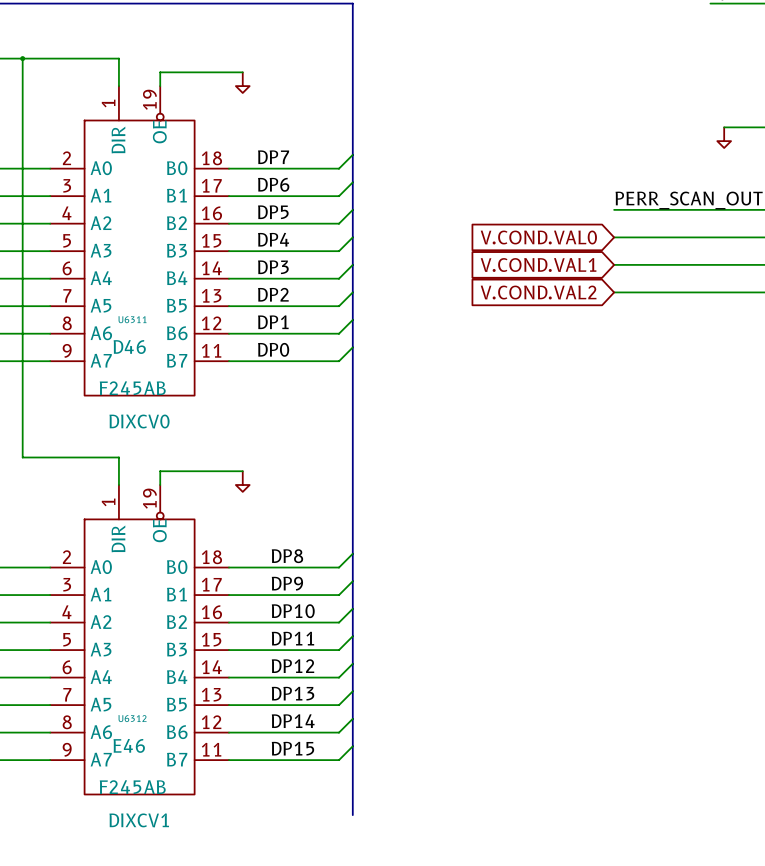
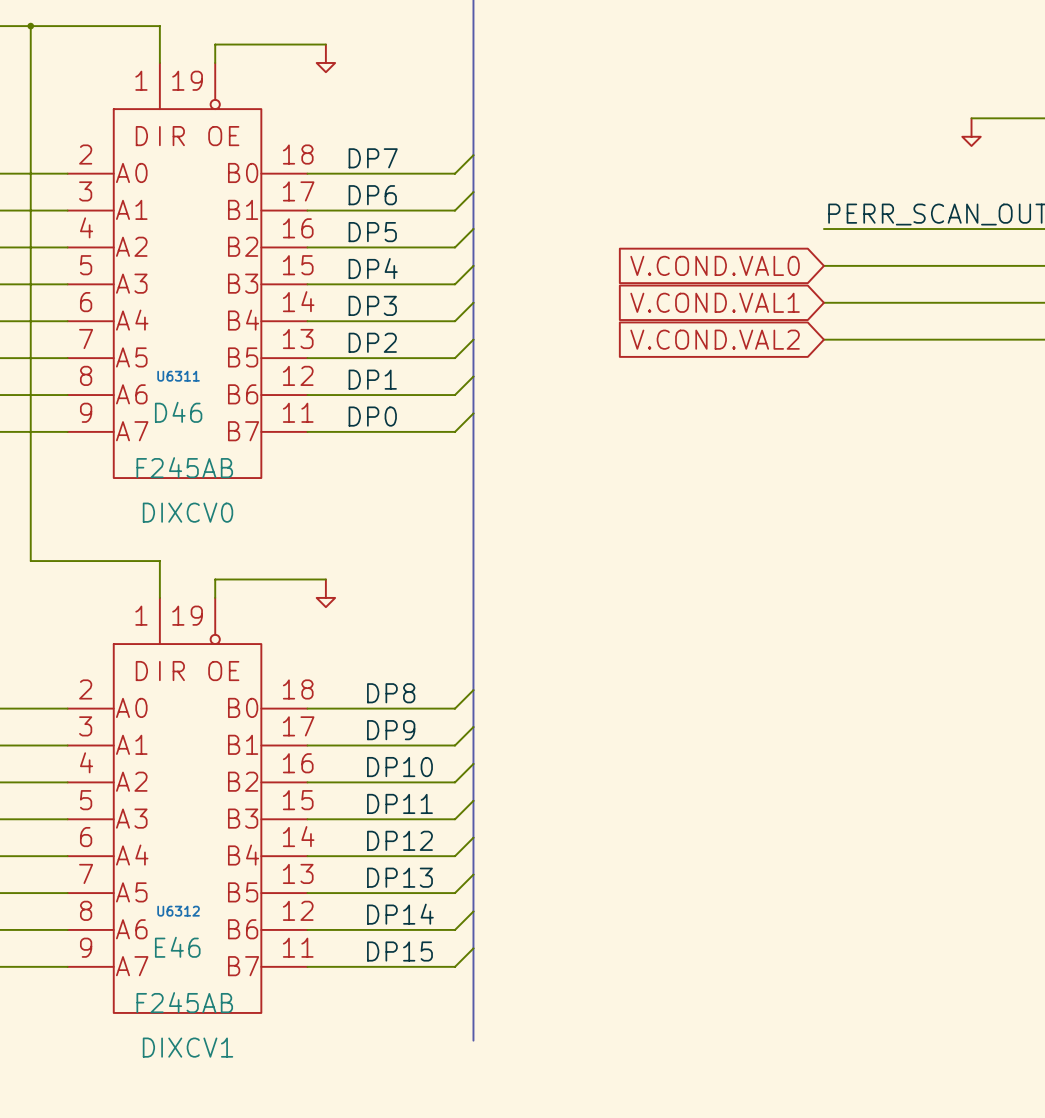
U6311 symbol: [50, 86, 230, 396] -> [67, 62, 308, 479]
U6312 symbol: [50, 485, 230, 795] -> [67, 597, 308, 1013]

